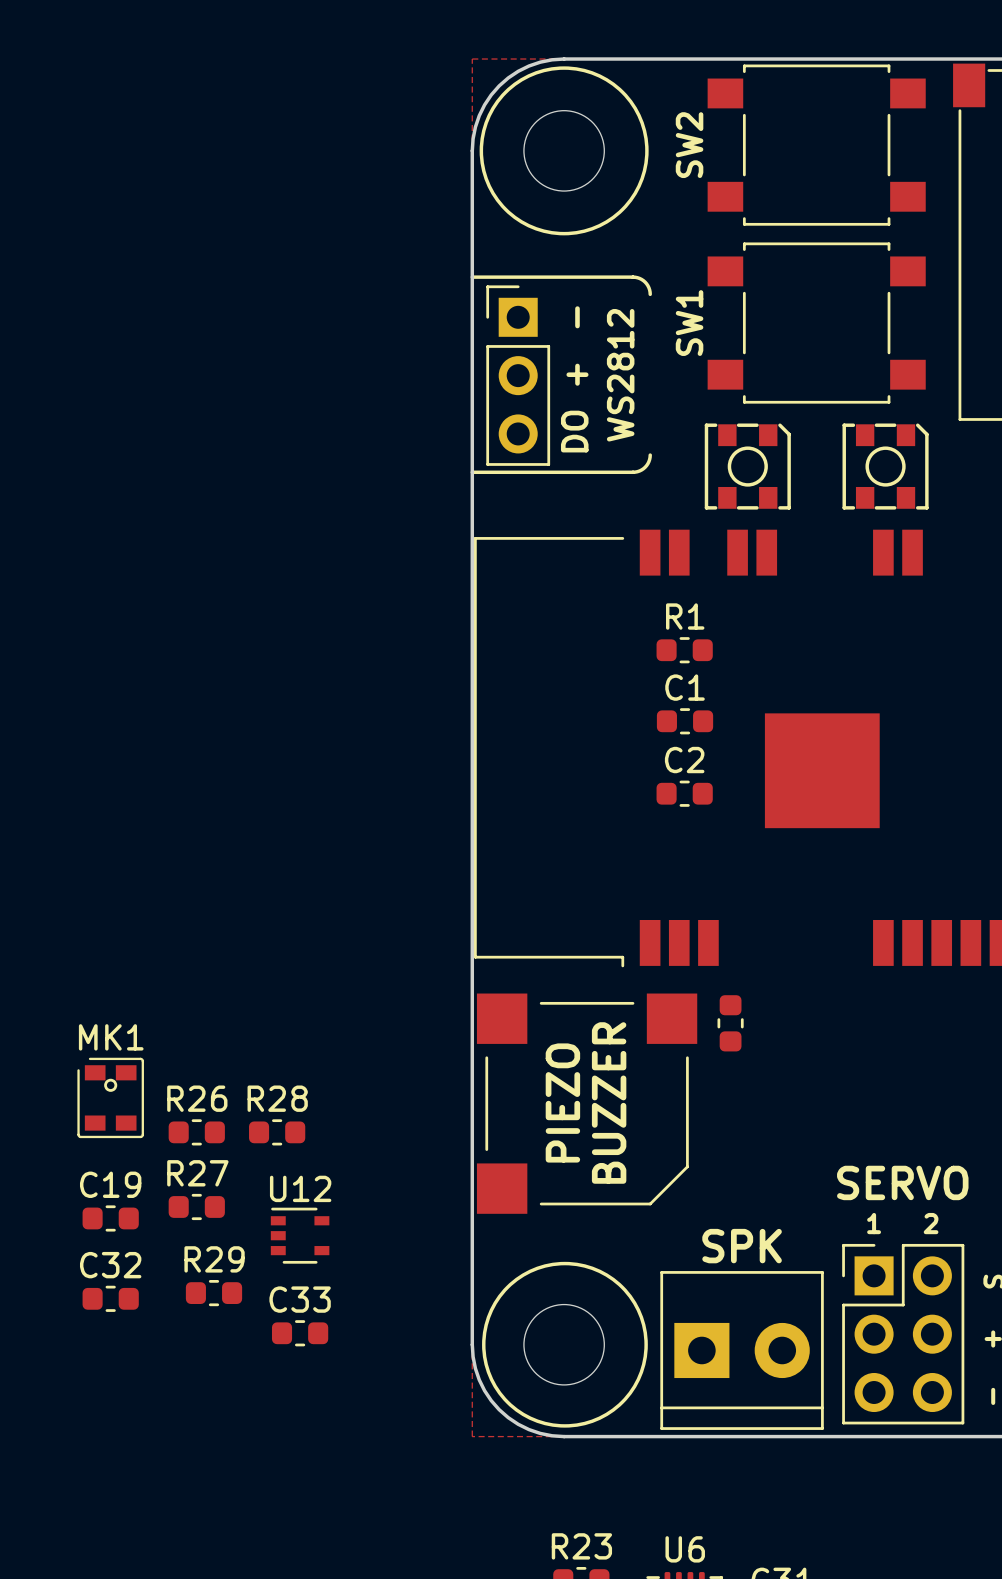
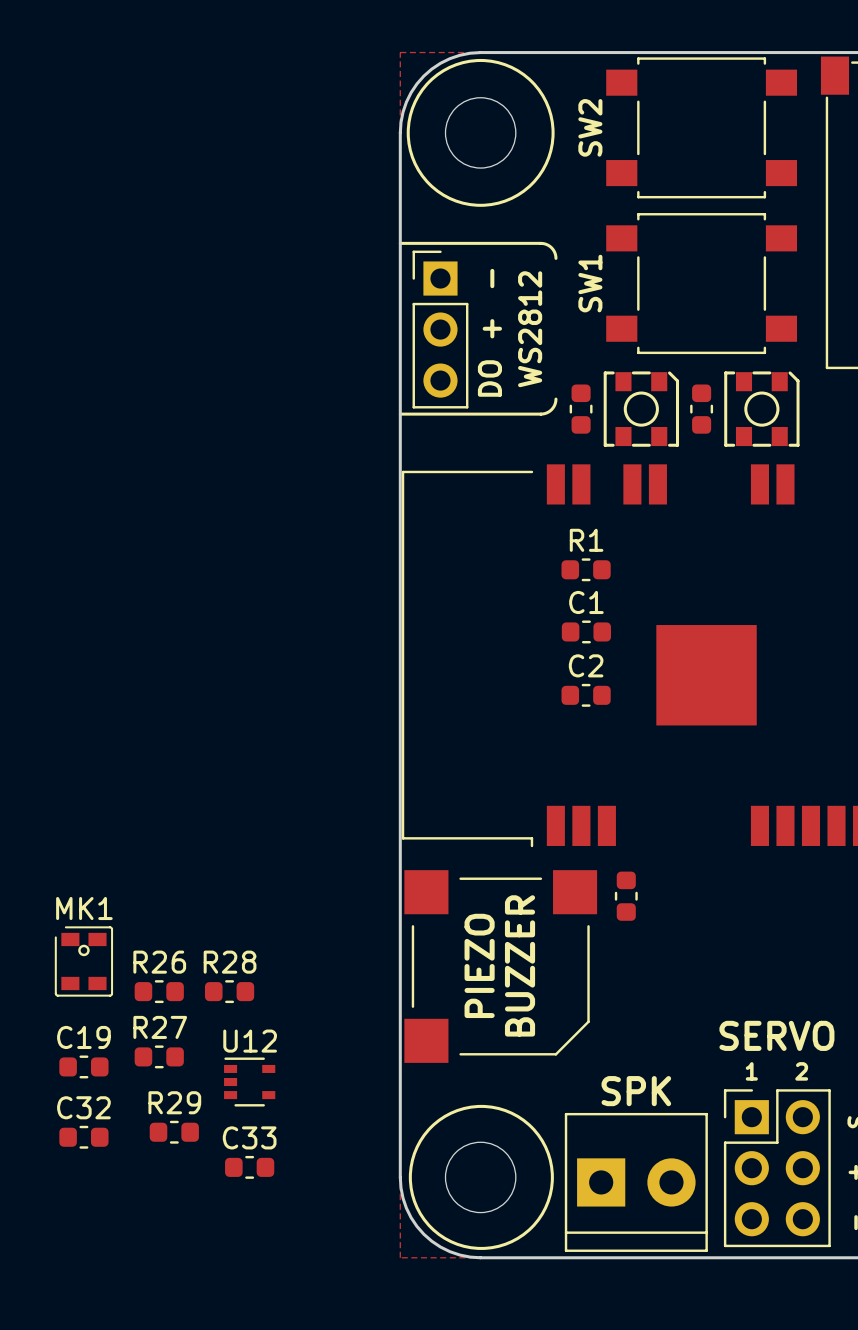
part: none -> (581, 409)
part: none -> (701, 409)

